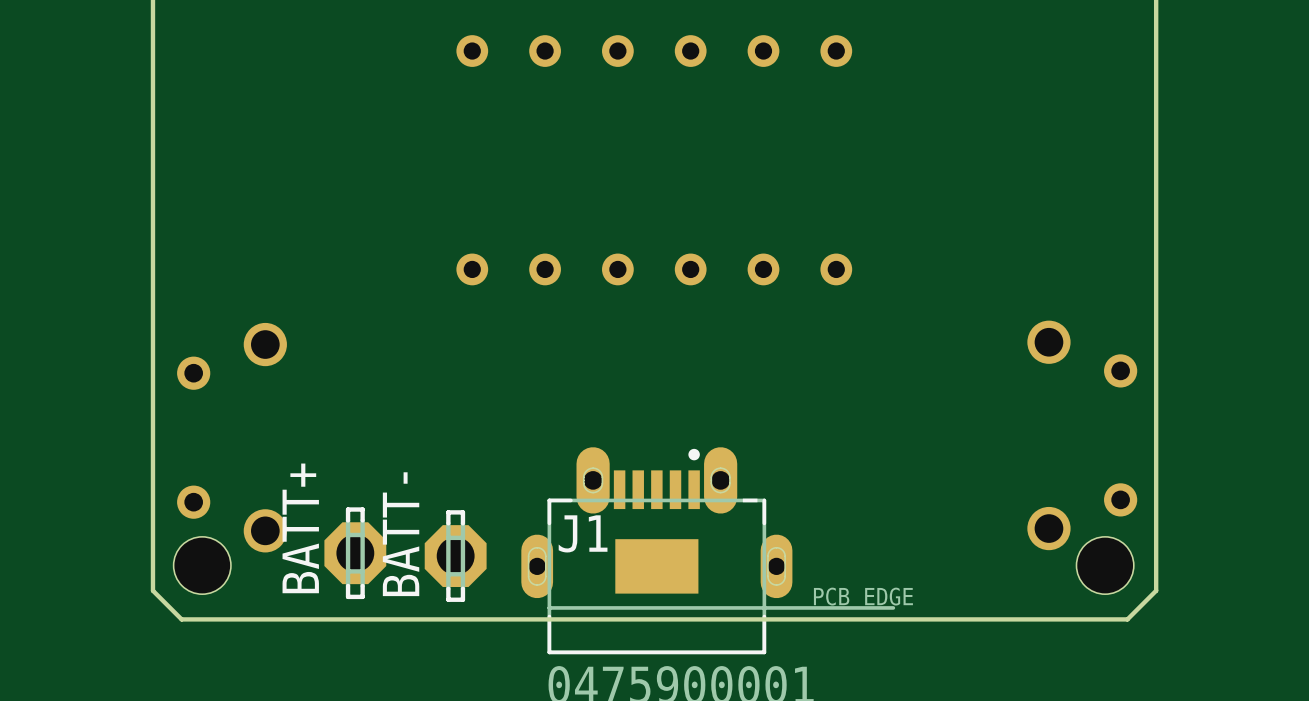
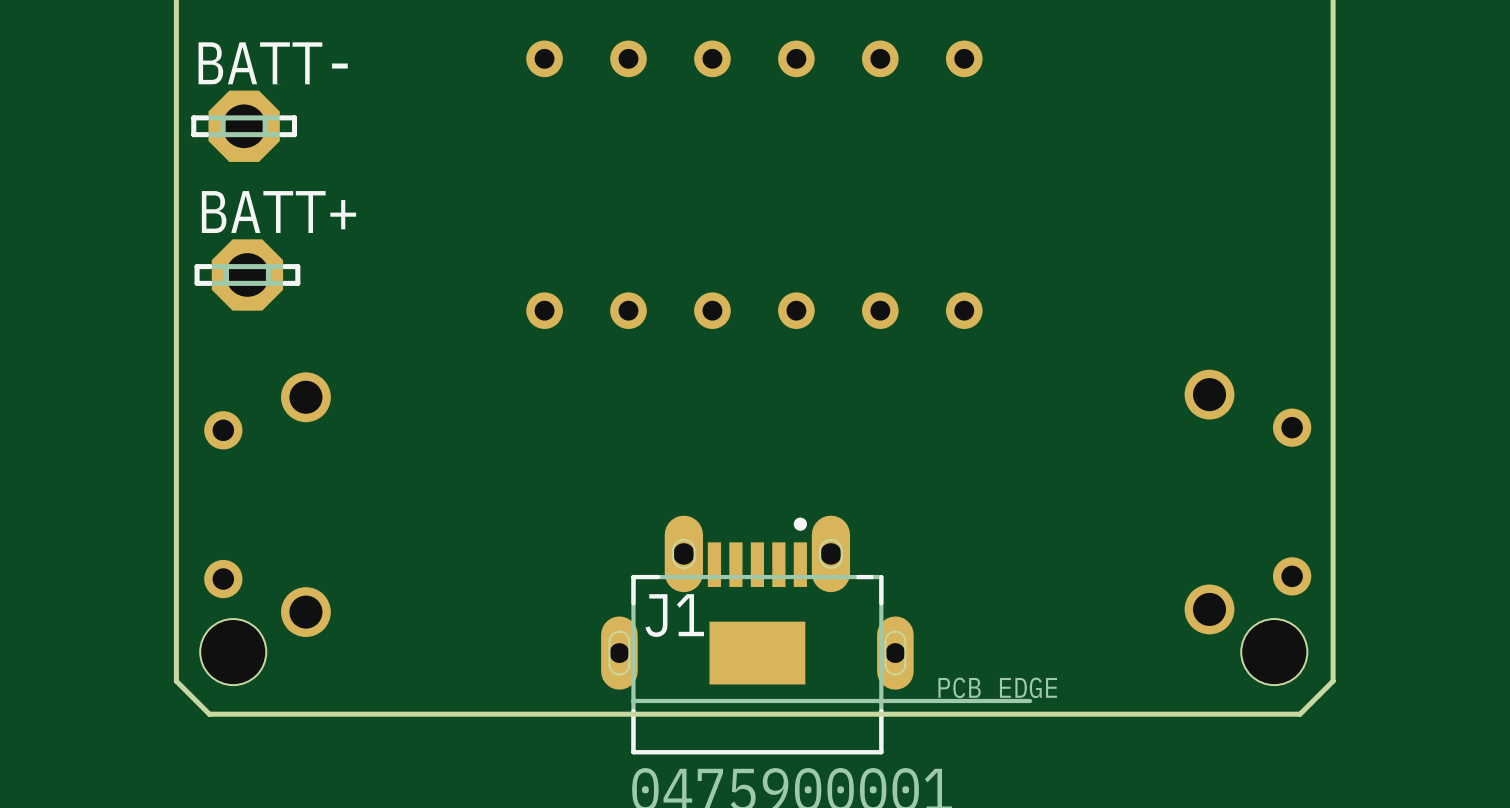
BATT+ rotation: 0° (355, 553) -> 90° clockwise (247, 274)
BATT+ position: (355, 553) -> (247, 274)
BATT- rotation: 0° (455, 556) -> 90° clockwise (244, 126)
BATT- position: (455, 556) -> (244, 126)

